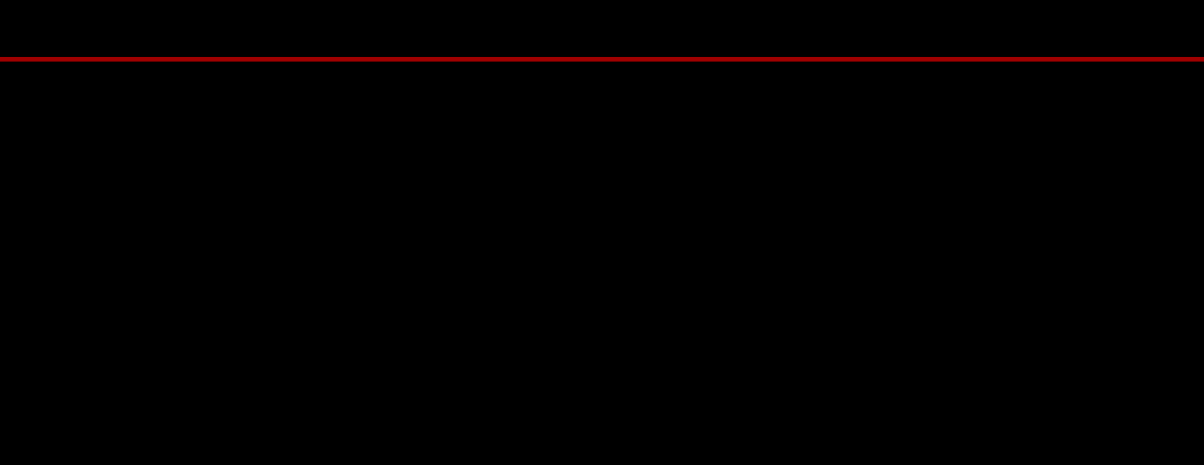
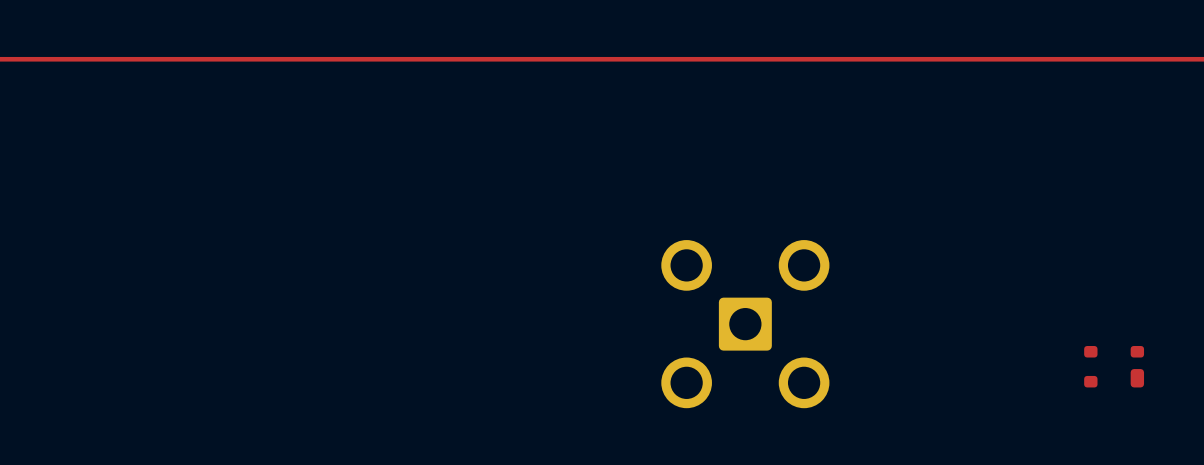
part: none -> (745, 324)
part: none -> (1114, 366)

